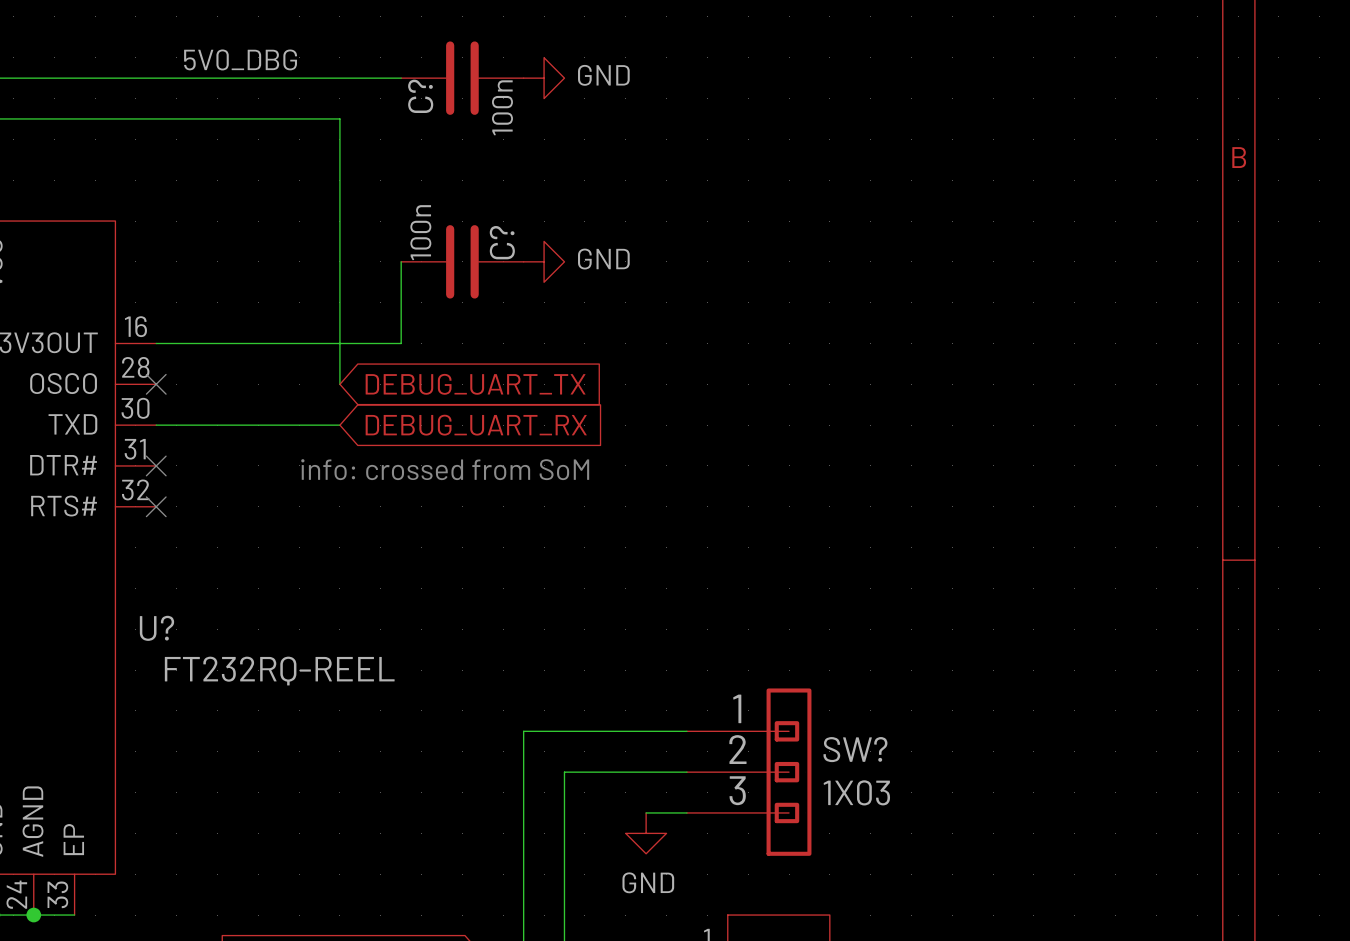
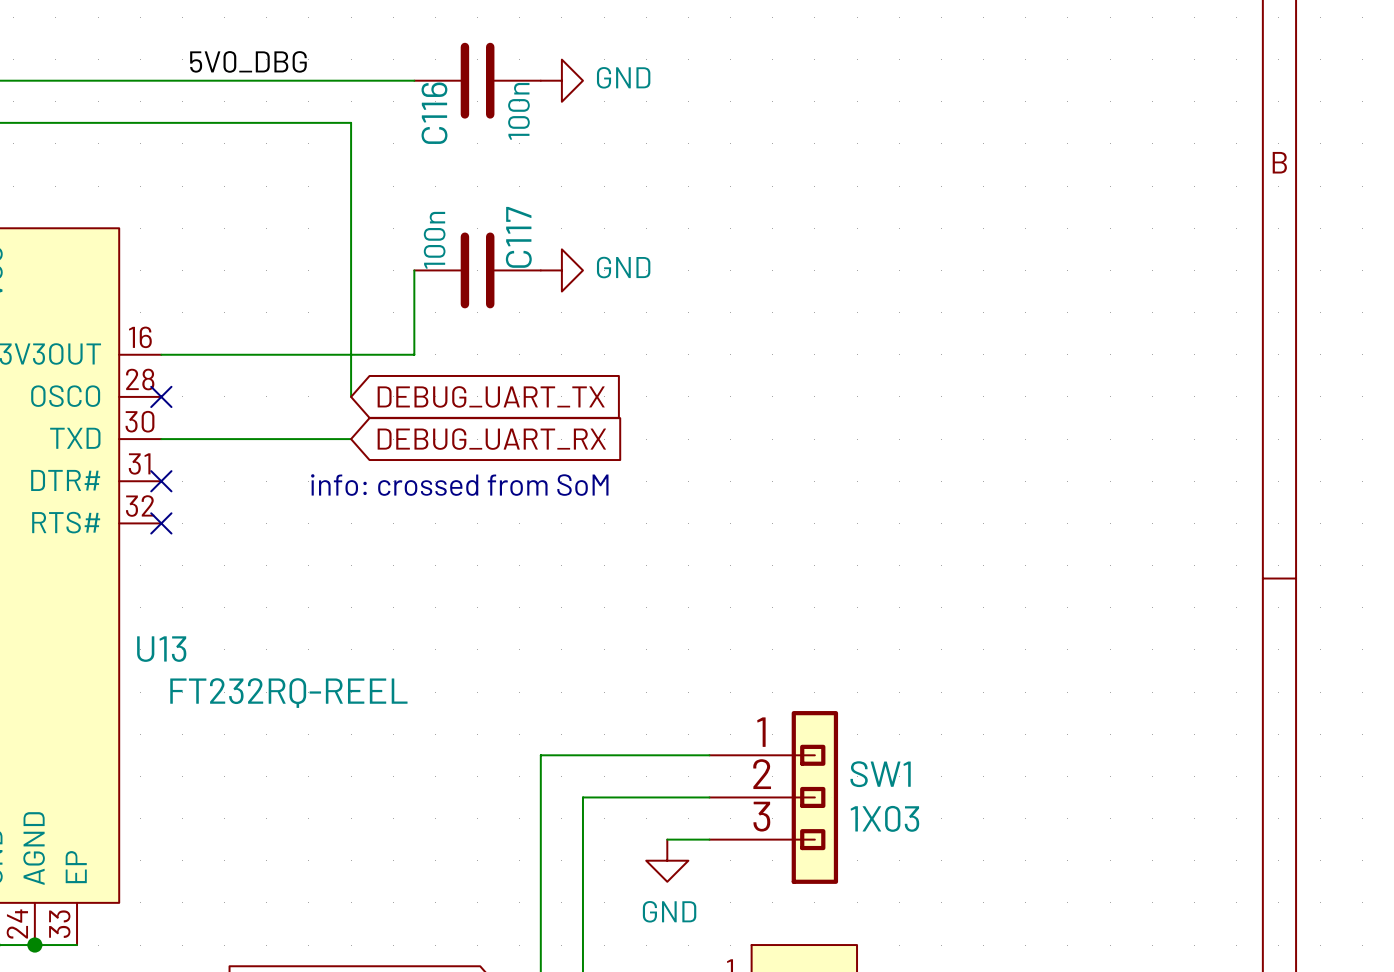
C? name: C? (420, 96) -> C116 (434, 113)
C? name: C? (502, 242) -> C117 (518, 237)
U? name: U? (156, 628) -> U13 (161, 649)
SW? name: SW? (855, 749) -> SW1 (880, 774)

